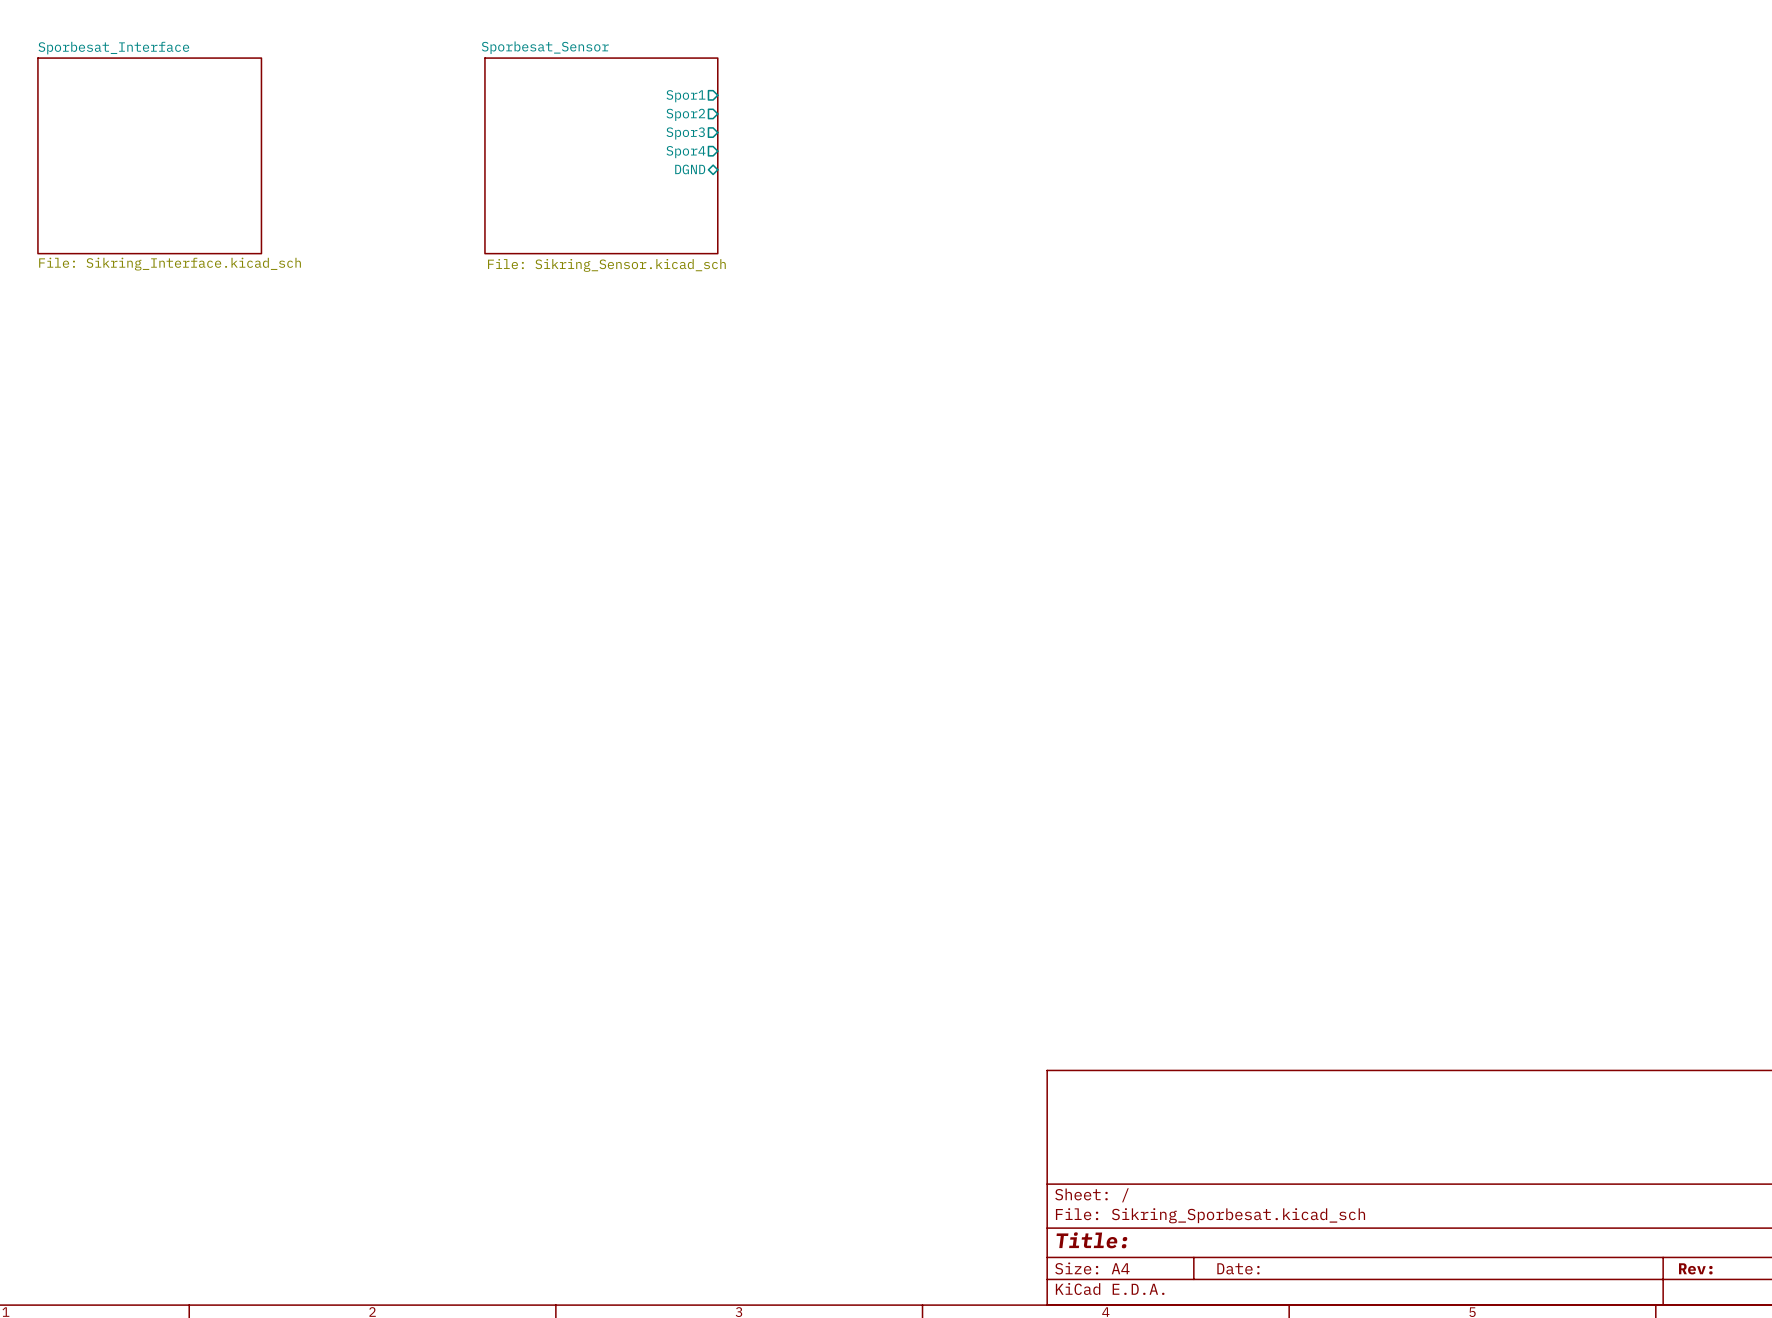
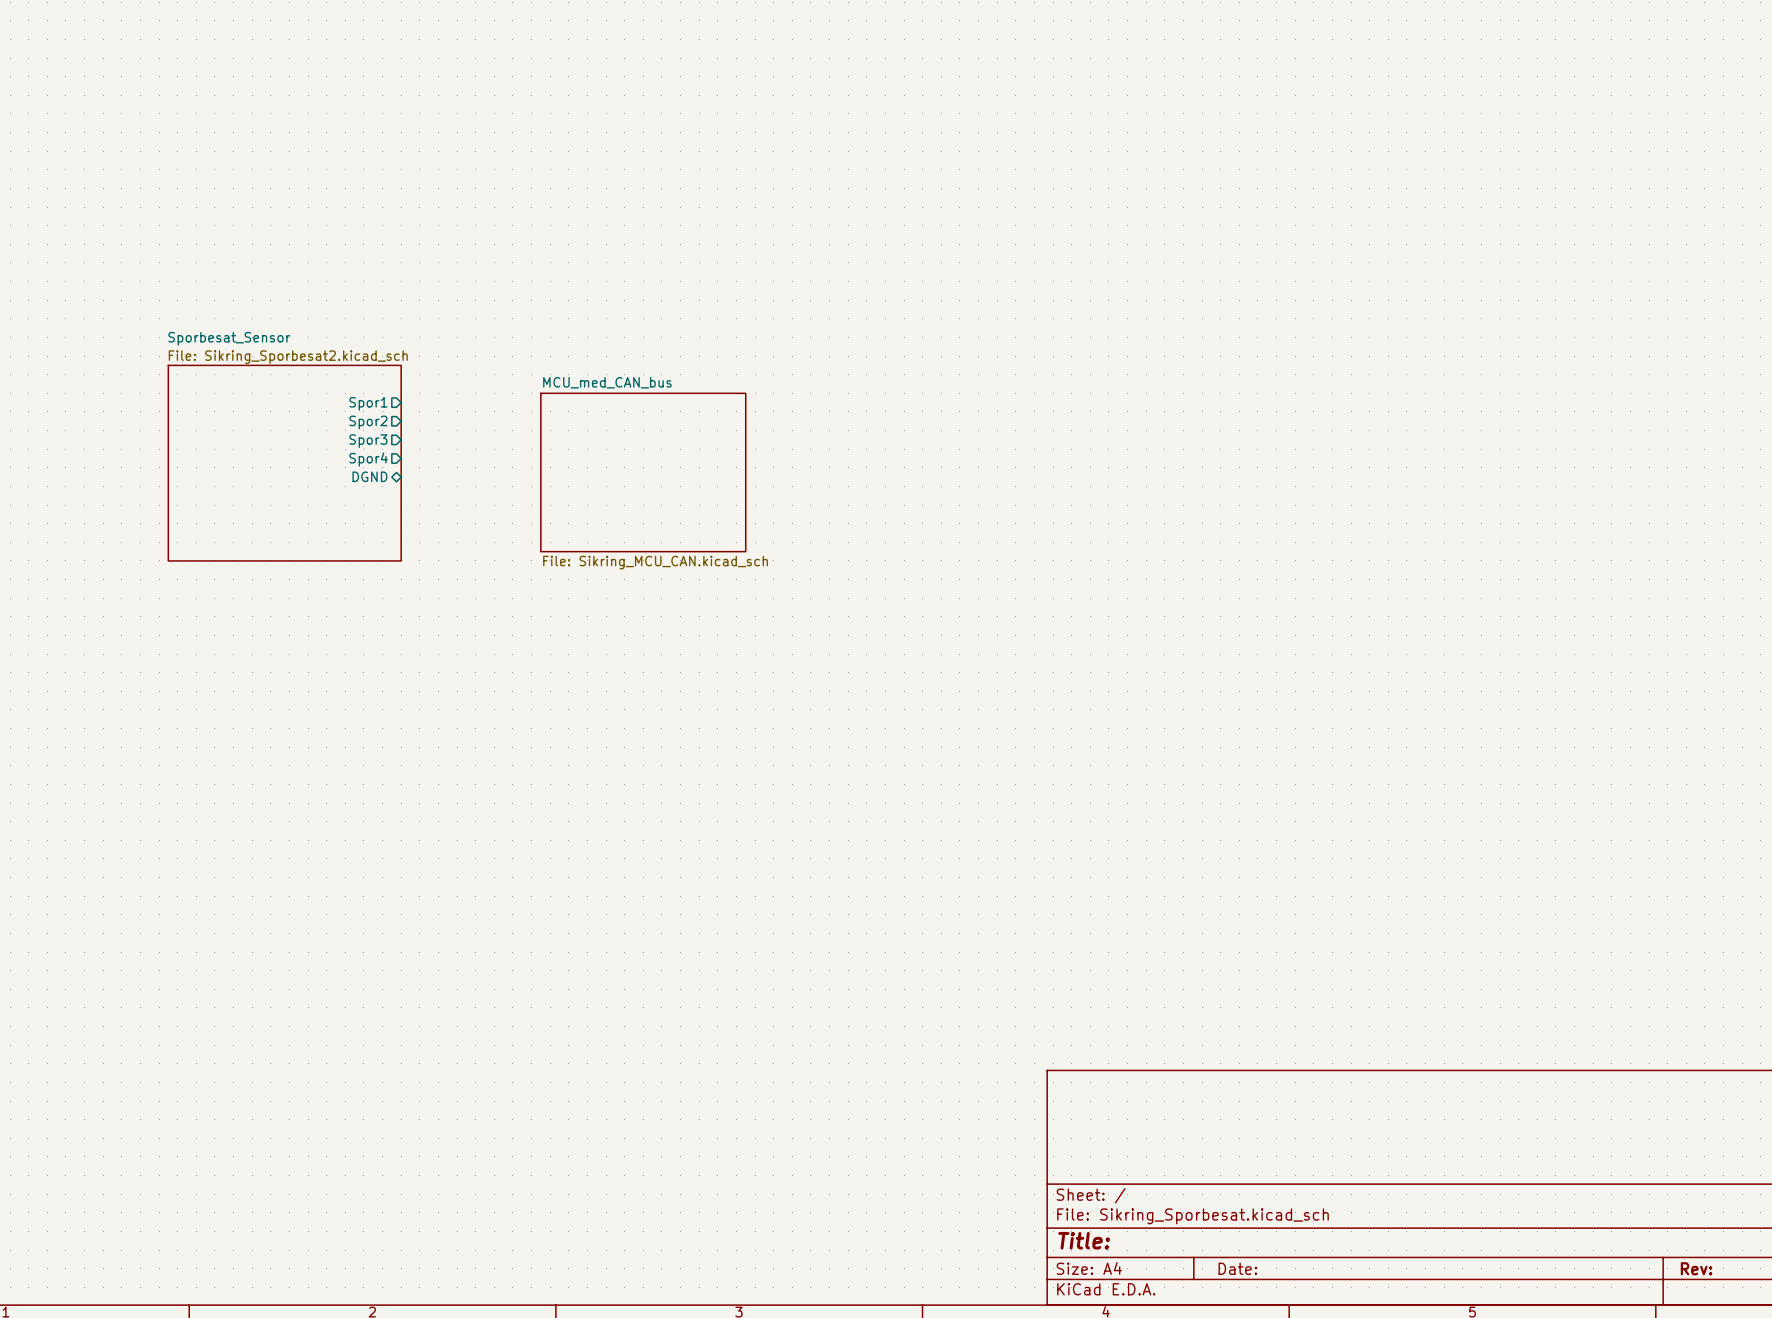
sheet pin: Spor1 (685, 96) -> none
sheet pin: Spor2 (685, 114) -> none
sheet pin: Spor3 (685, 133) -> none
sheet pin: Spor4 (685, 152) -> none
sheet Sporbesat_Interface: File: Sikring_Interface.kicad_sch (149, 155) -> none
sheet Sporbesat_Sensor: File: Sikring_Sensor.kicad_sch (601, 155) -> none
sheet pin: DGND (690, 169) -> none
sheet pin: none -> Spor1 (368, 403)
sheet pin: none -> Spor2 (368, 422)
sheet pin: none -> Spor3 (368, 441)
sheet pin: none -> Spor4 (368, 459)
sheet Sporbesat_Sensor: none -> File: Sikring_Sporbesat2.kicad_sch (284, 463)
sheet MCU_med_CAN_bus: none -> File: Sikring_MCU_CAN.kicad_sch (643, 472)
sheet pin: none -> DGND (369, 476)

